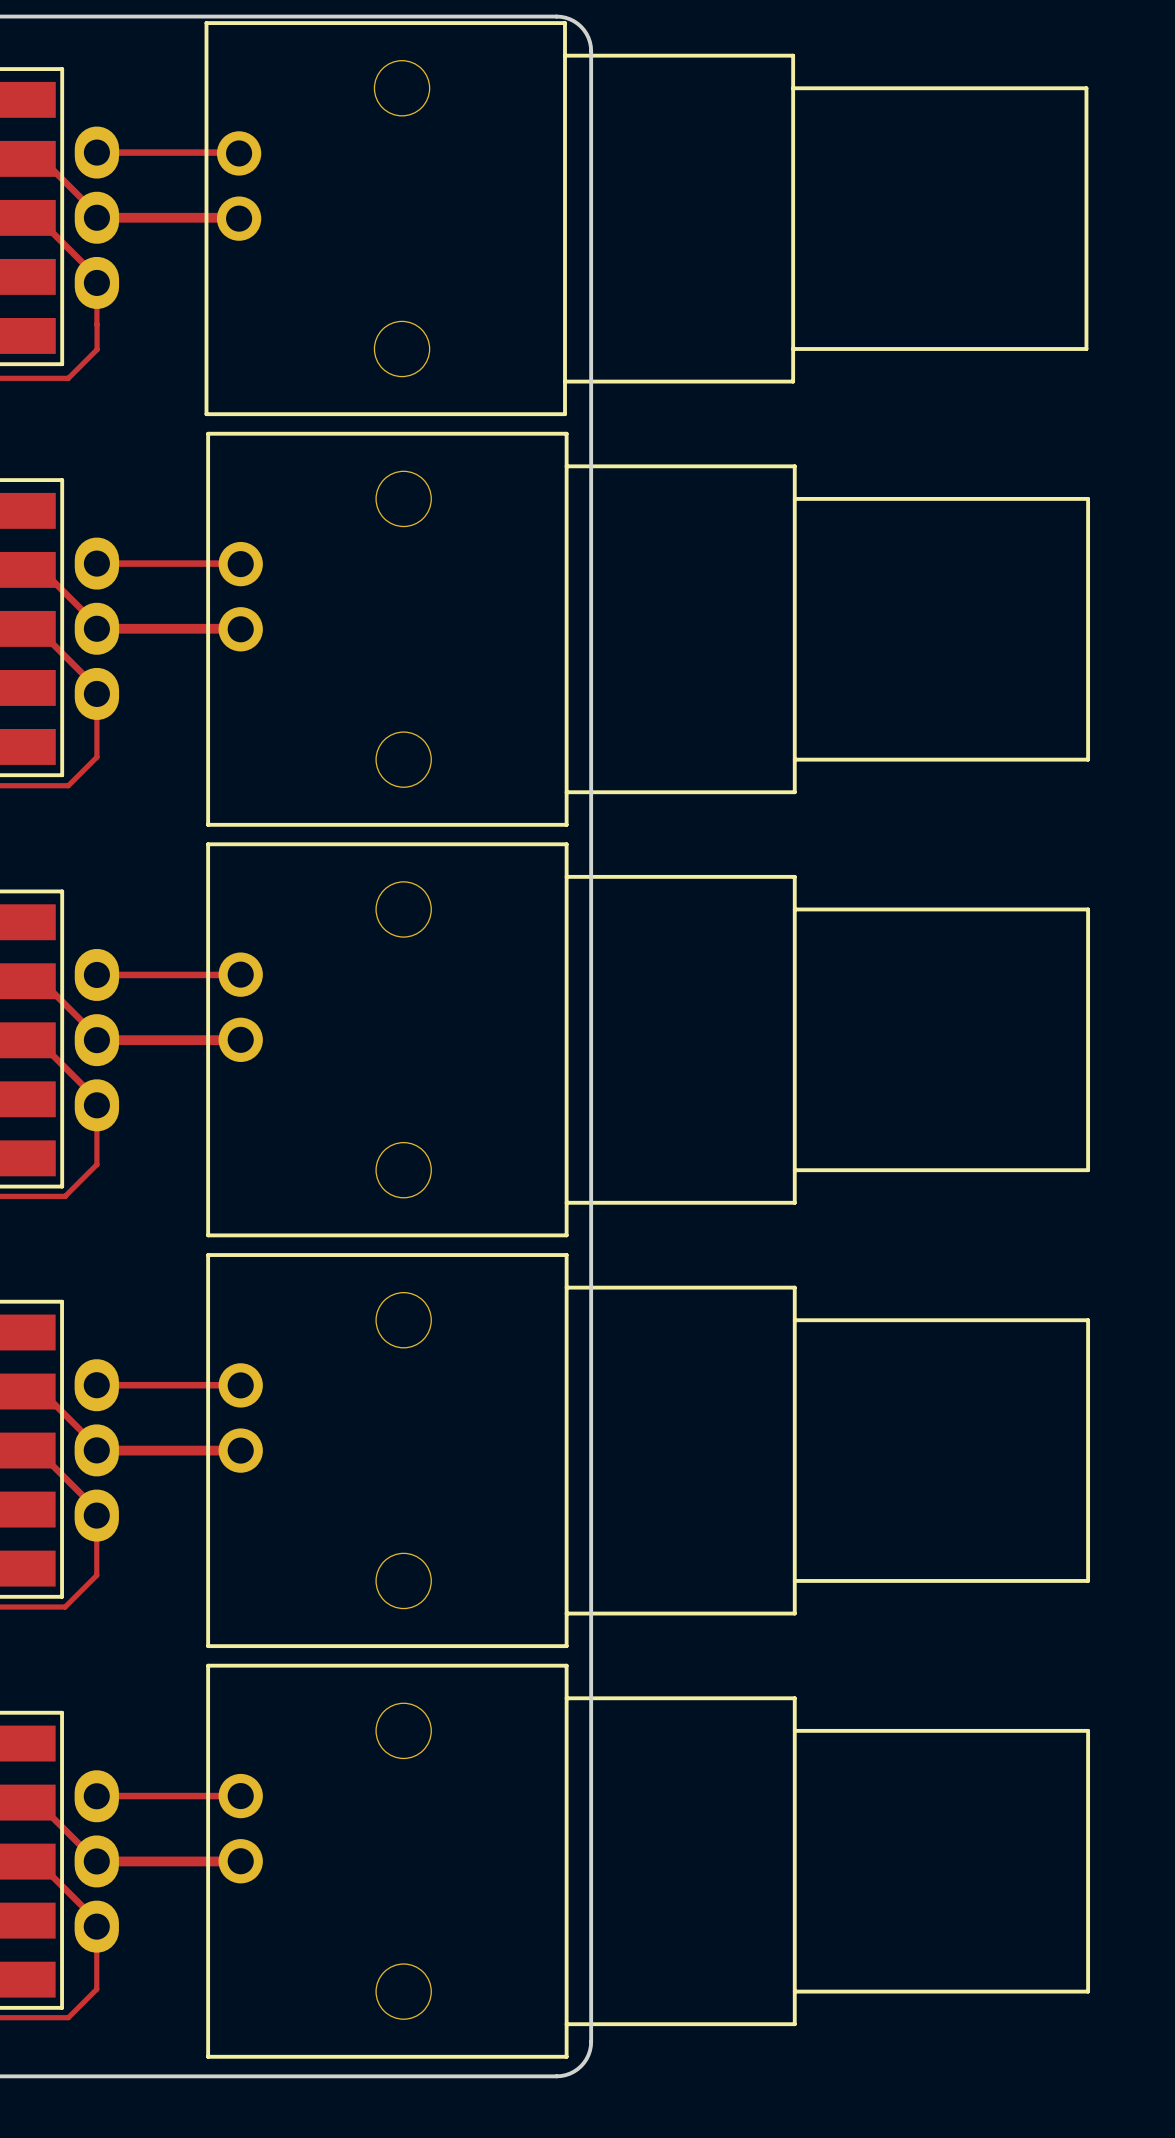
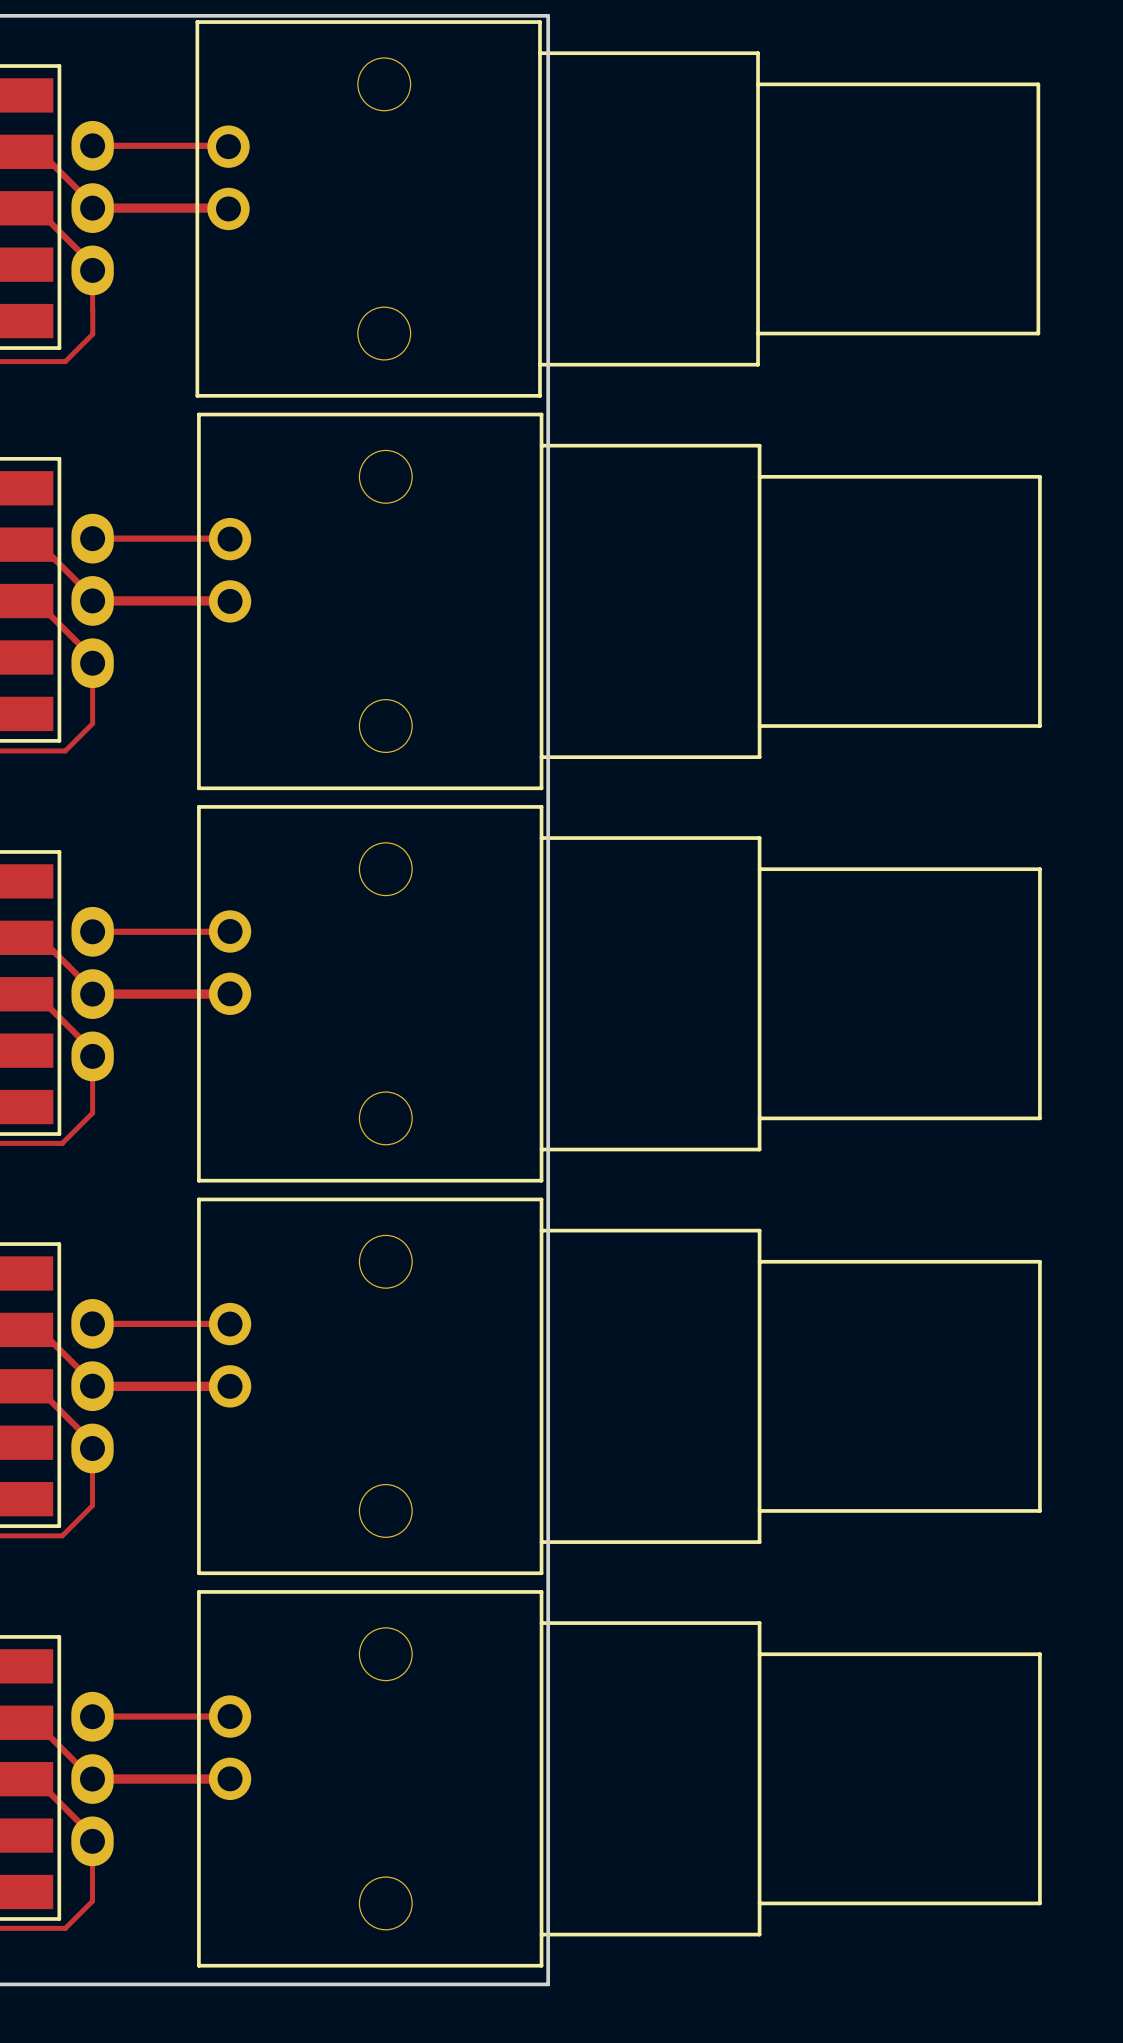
board edge: (556, 16) (569, 19) (581, 26) (588, 37) (591, 51) (591, 2041) (588, 2055) (581, 2066) (569, 2073) (556, 2076) -> (531, 15) (548, 15) (548, 1984) (531, 1984)

